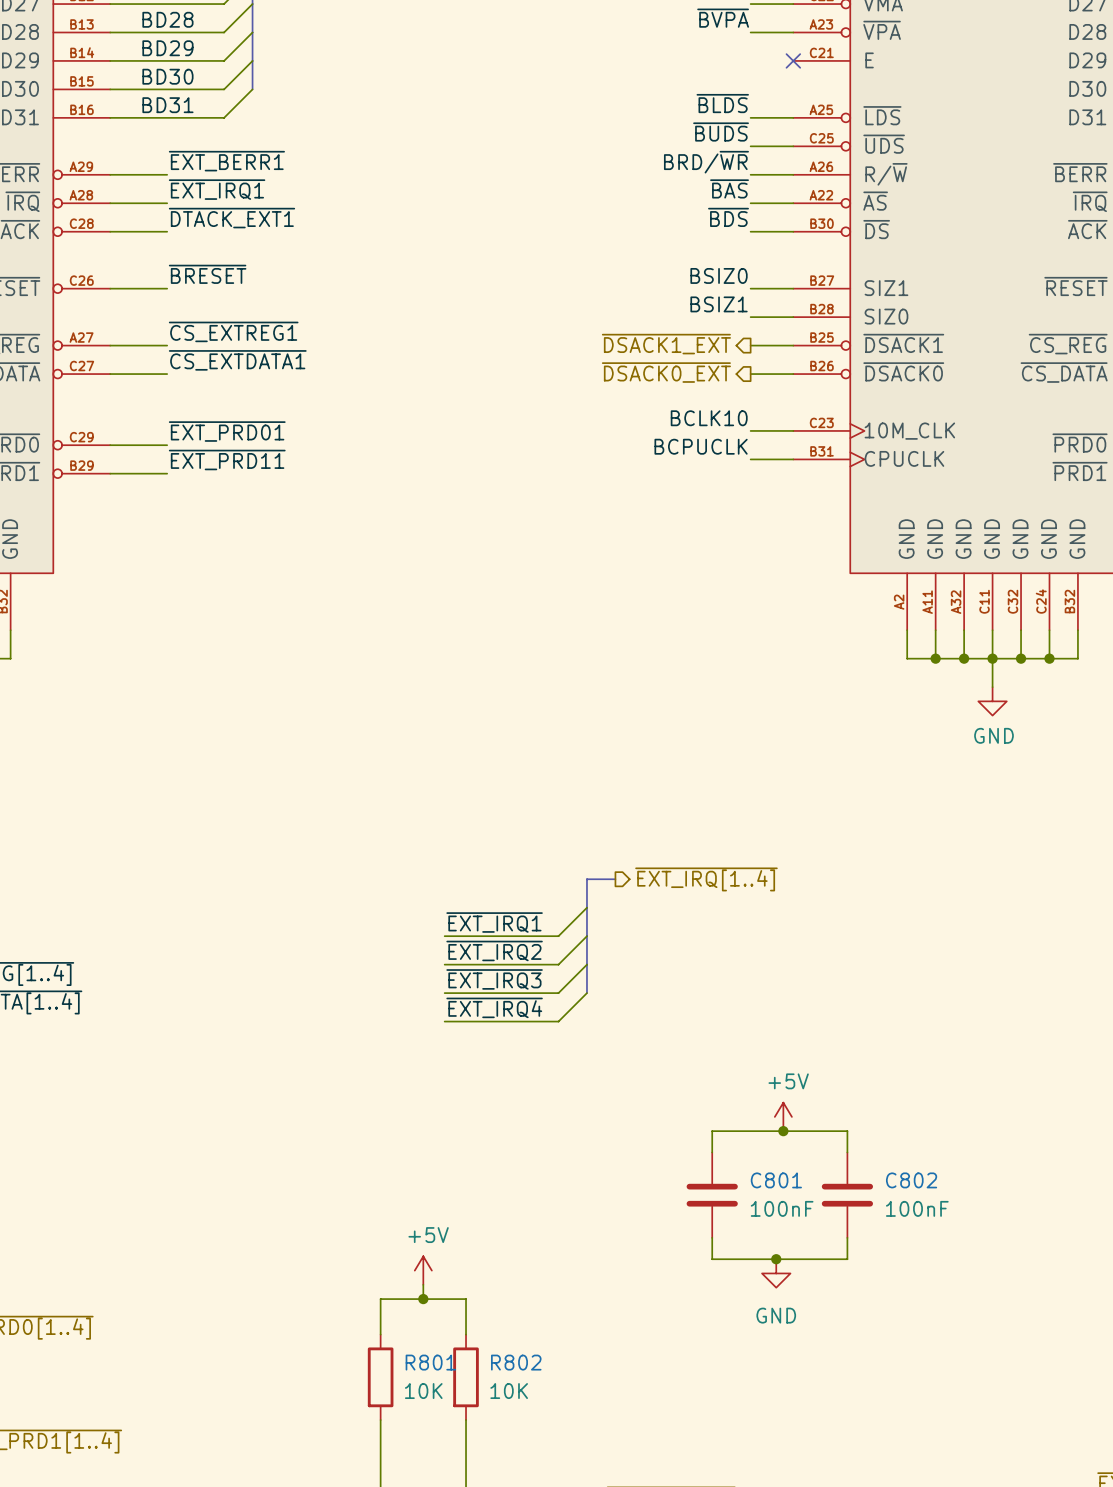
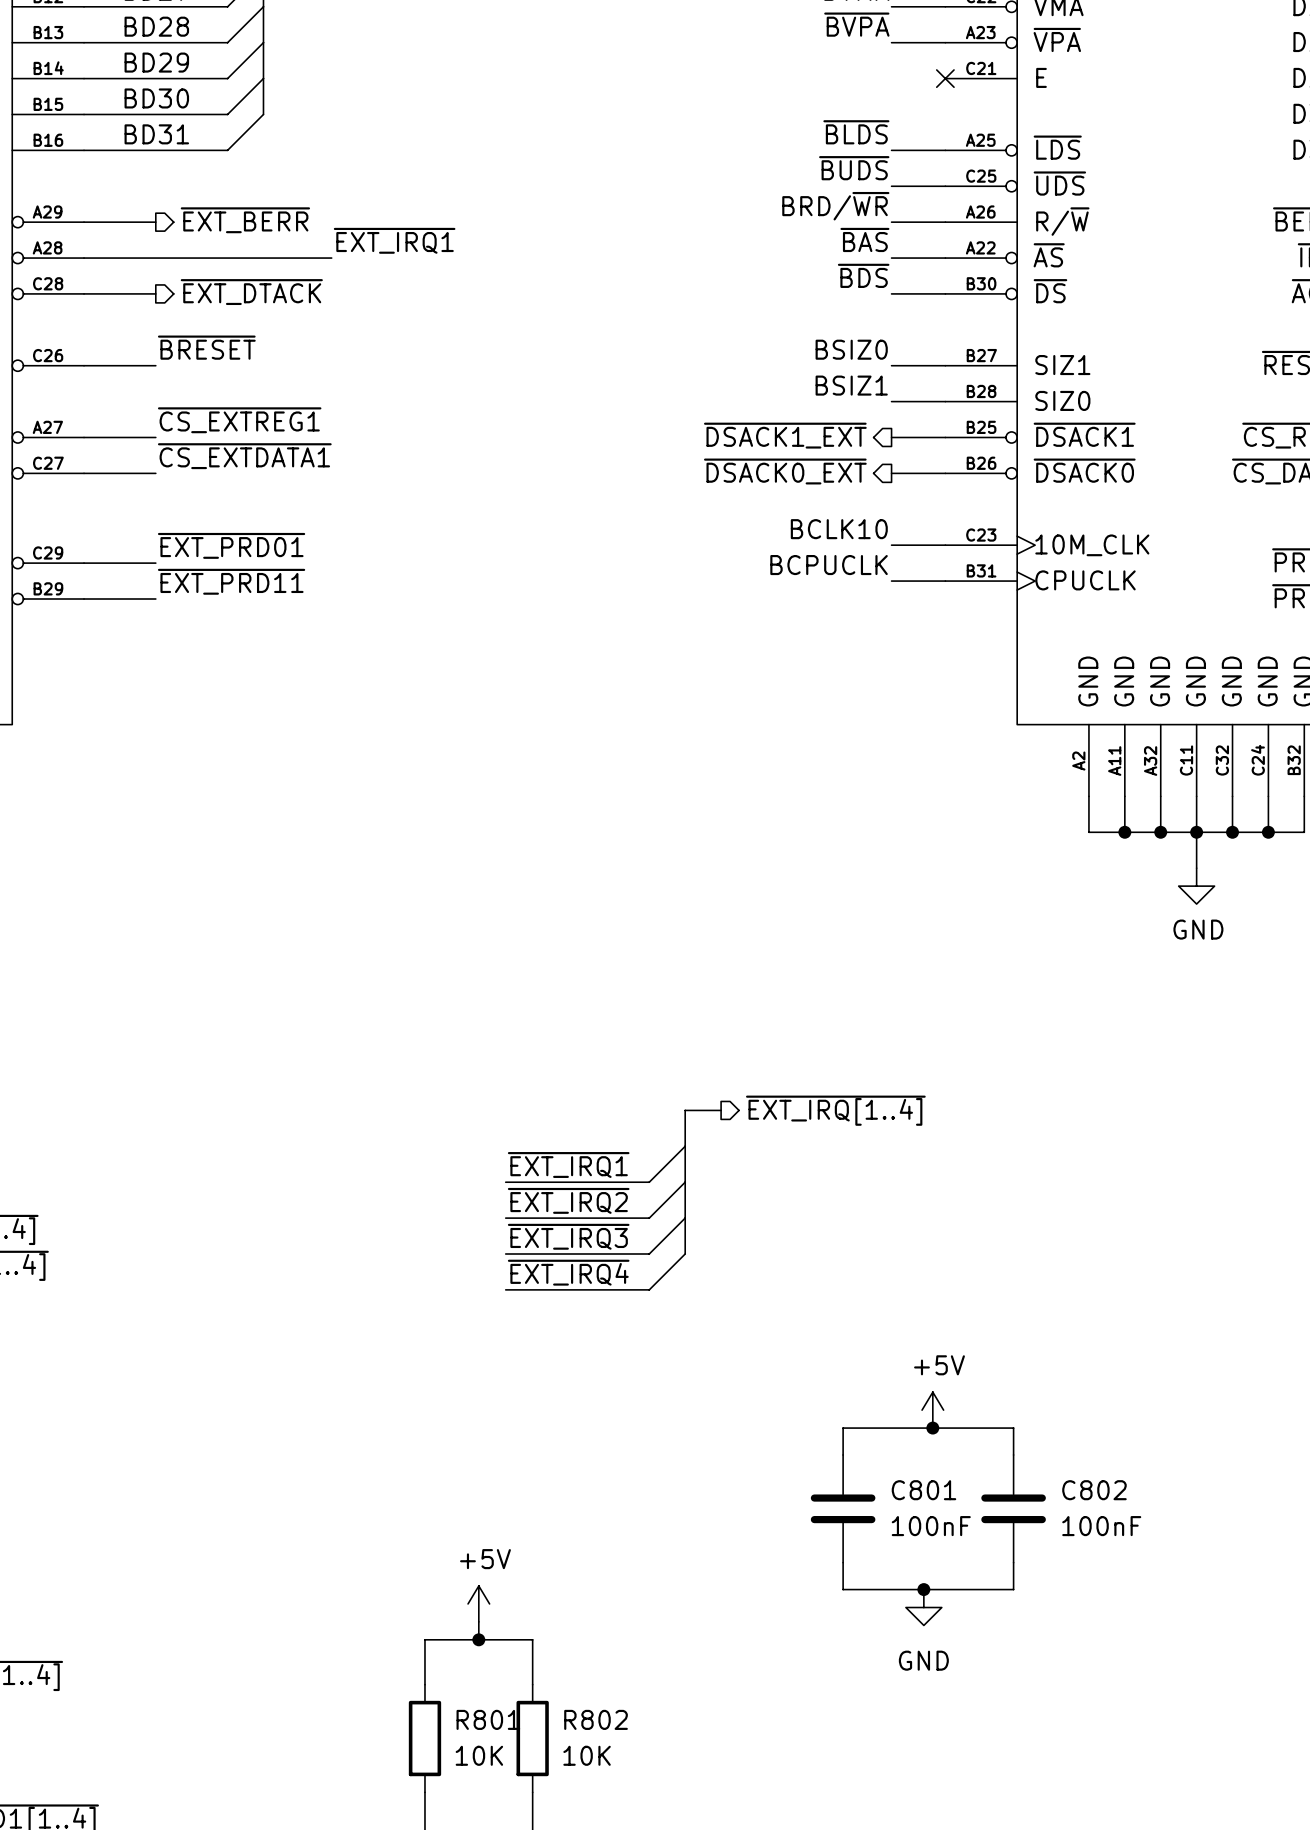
label: ~{EXT_BERR1} (226, 161) -> none
hierarchical label: none -> ~{EXT_BERR} (245, 220)
label position: ~{EXT_IRQ1} (217, 189) -> ~{EXT_IRQ1} (394, 240)
wire: none -> (155, 258) (331, 258)
label: ~{DTACK_EXT1} (231, 218) -> none
hierarchical label: none -> ~{EXT_DTACK} (251, 292)

